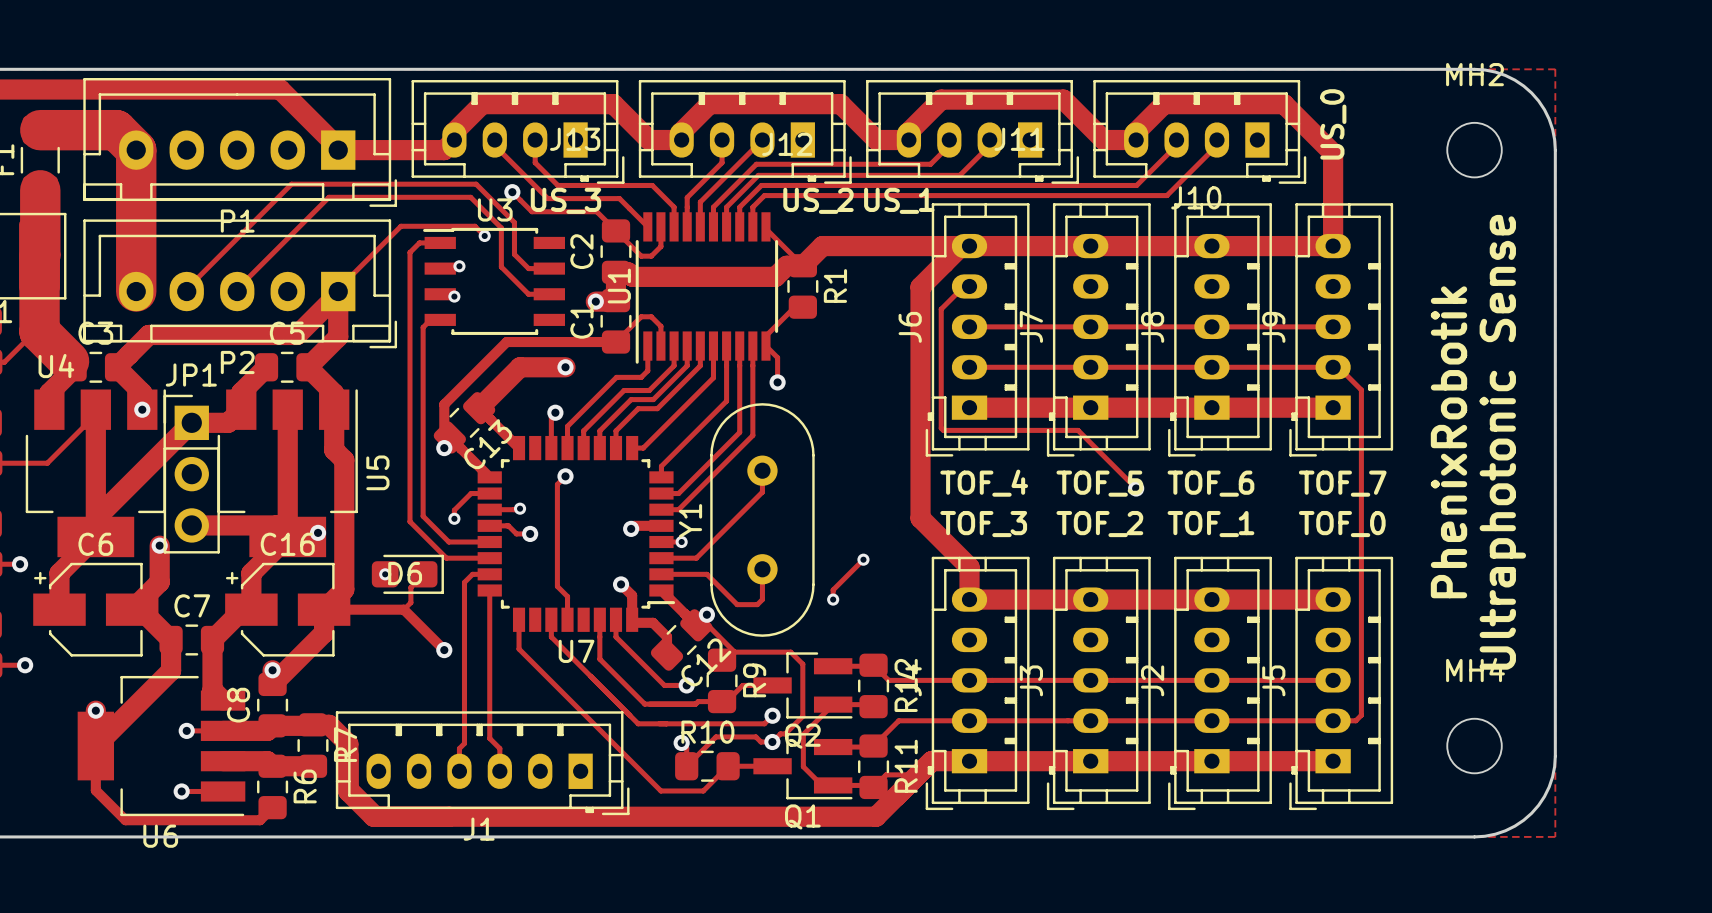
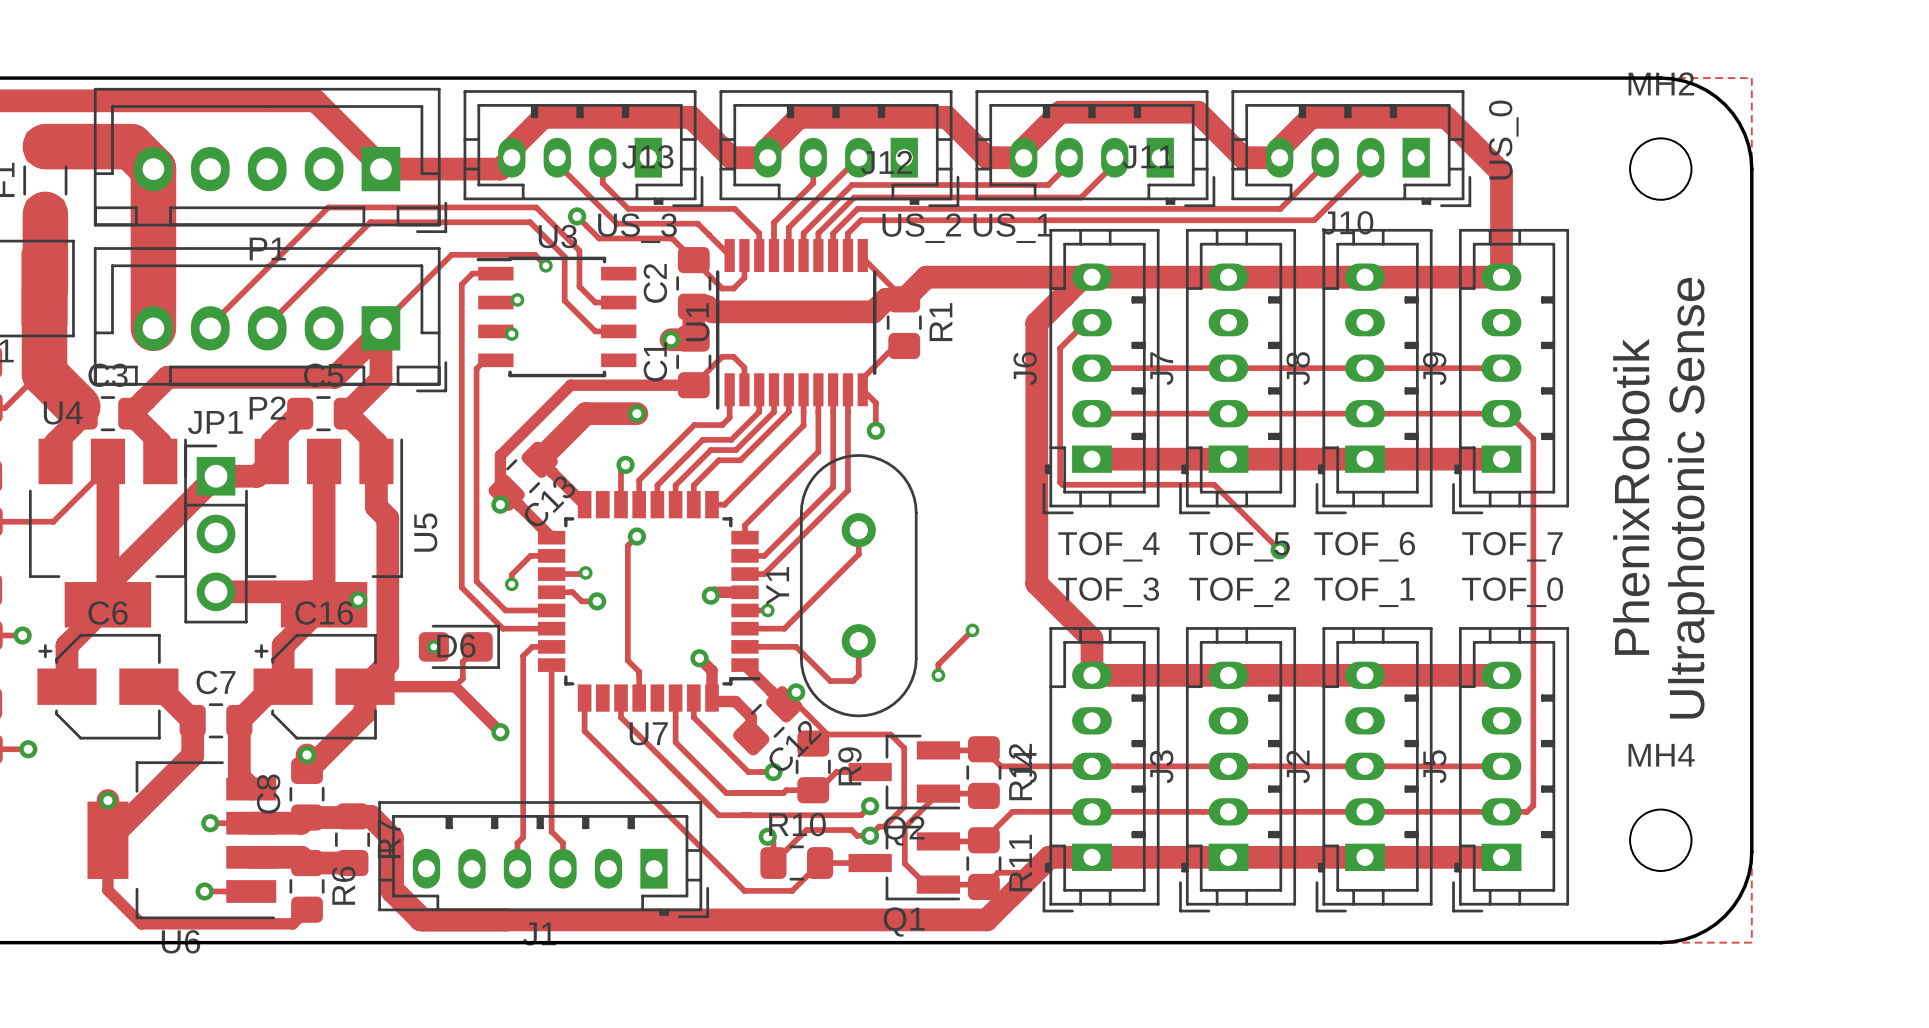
via: (142, 409) -> none
track: (159, 545) (159, 582) (132, 609) -> none
via: (159, 545) -> none

